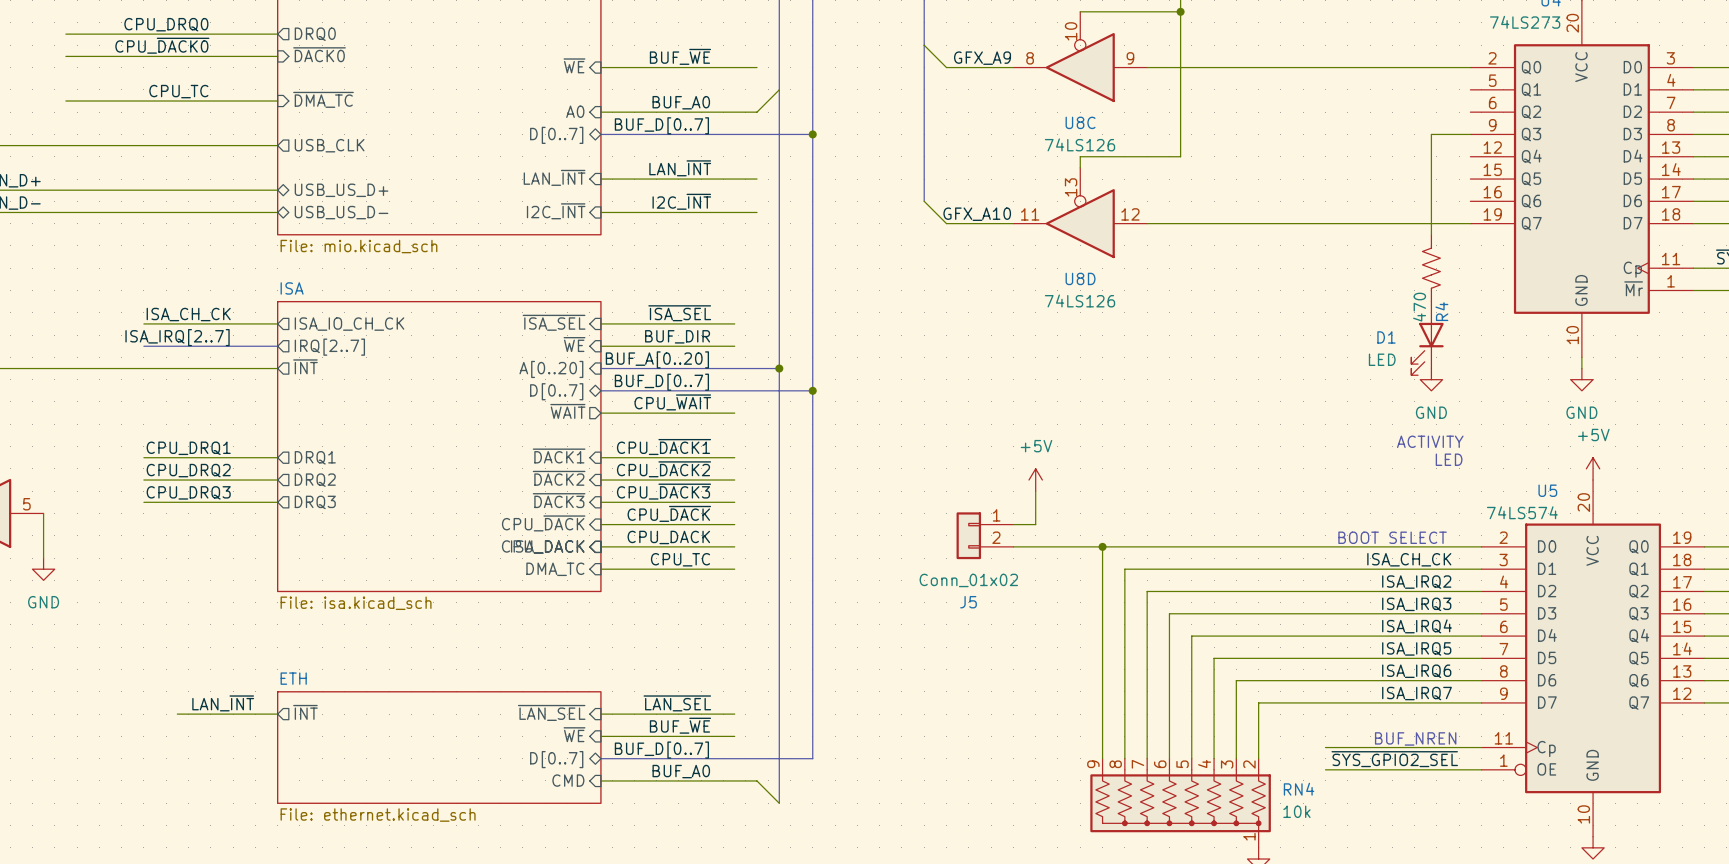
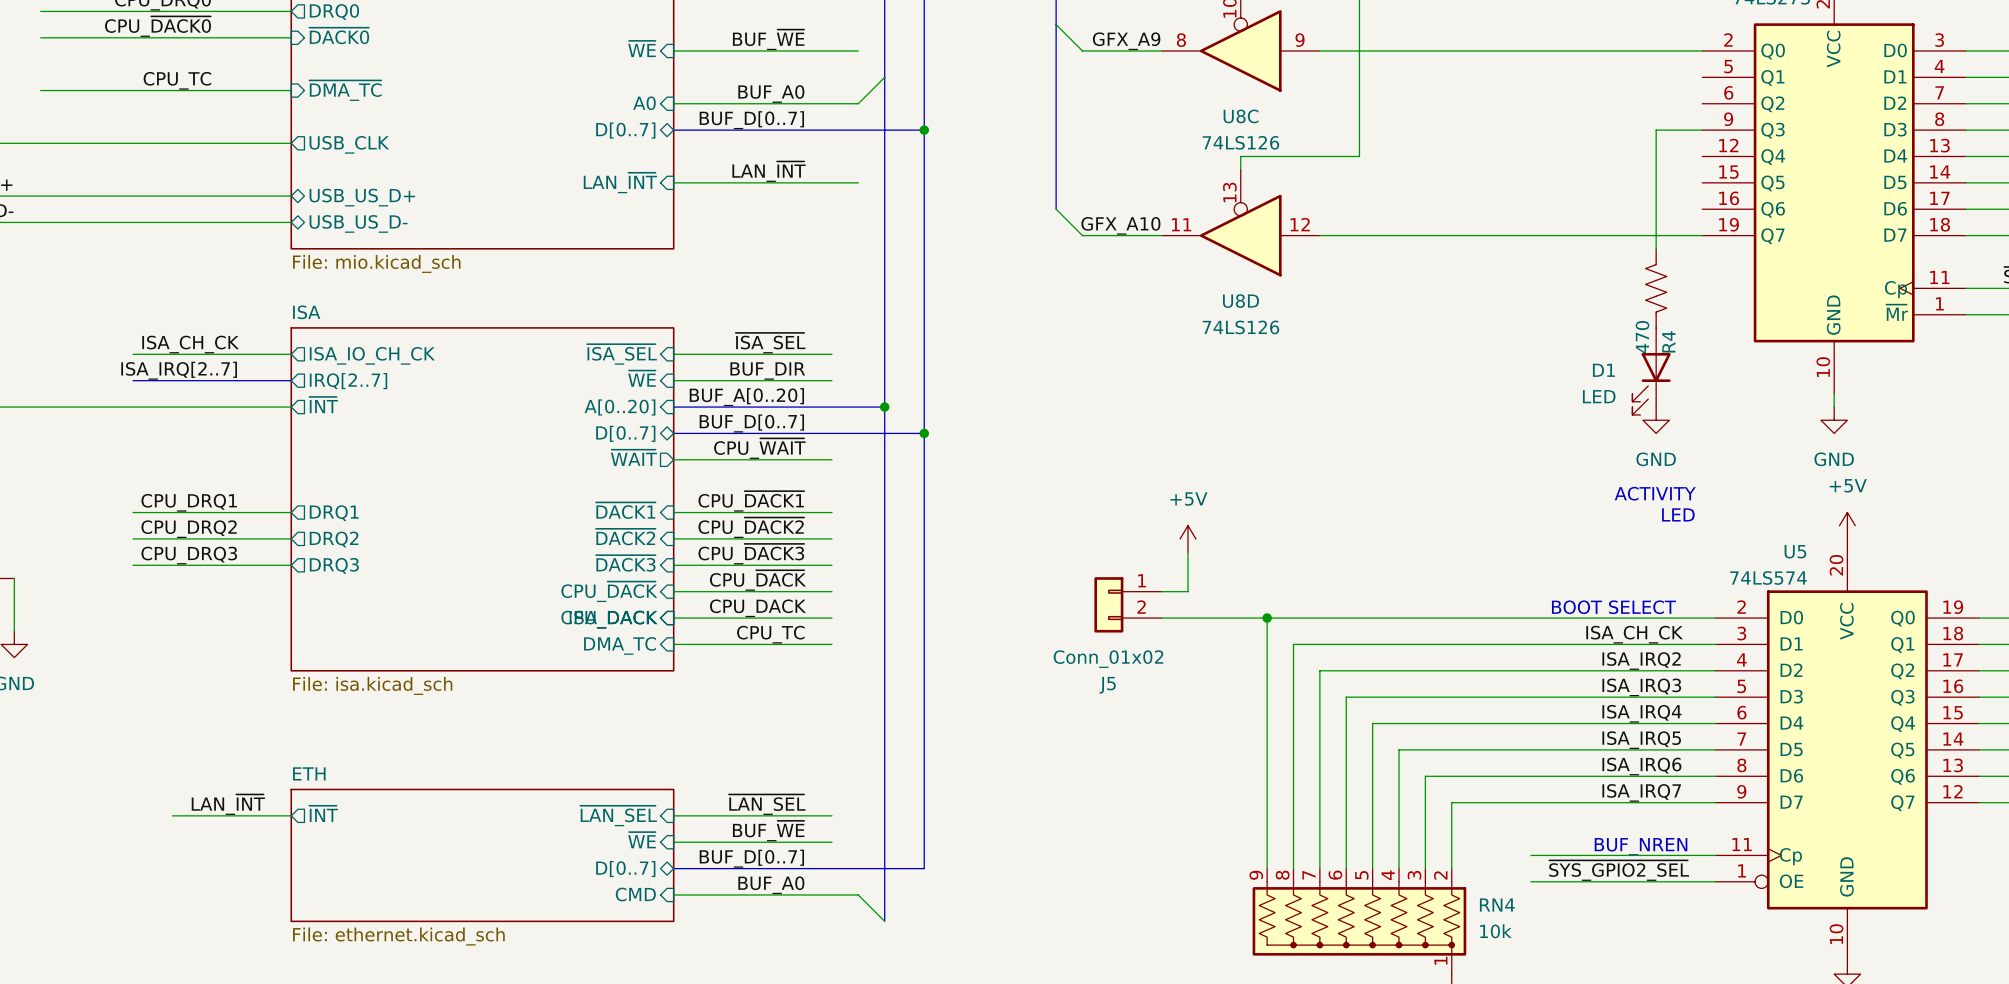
label: I2C_~{INT} (681, 201) -> none
sheet pin: I2C_~{INT} (556, 211) -> none
wire: (600, 212) (757, 212) -> none

